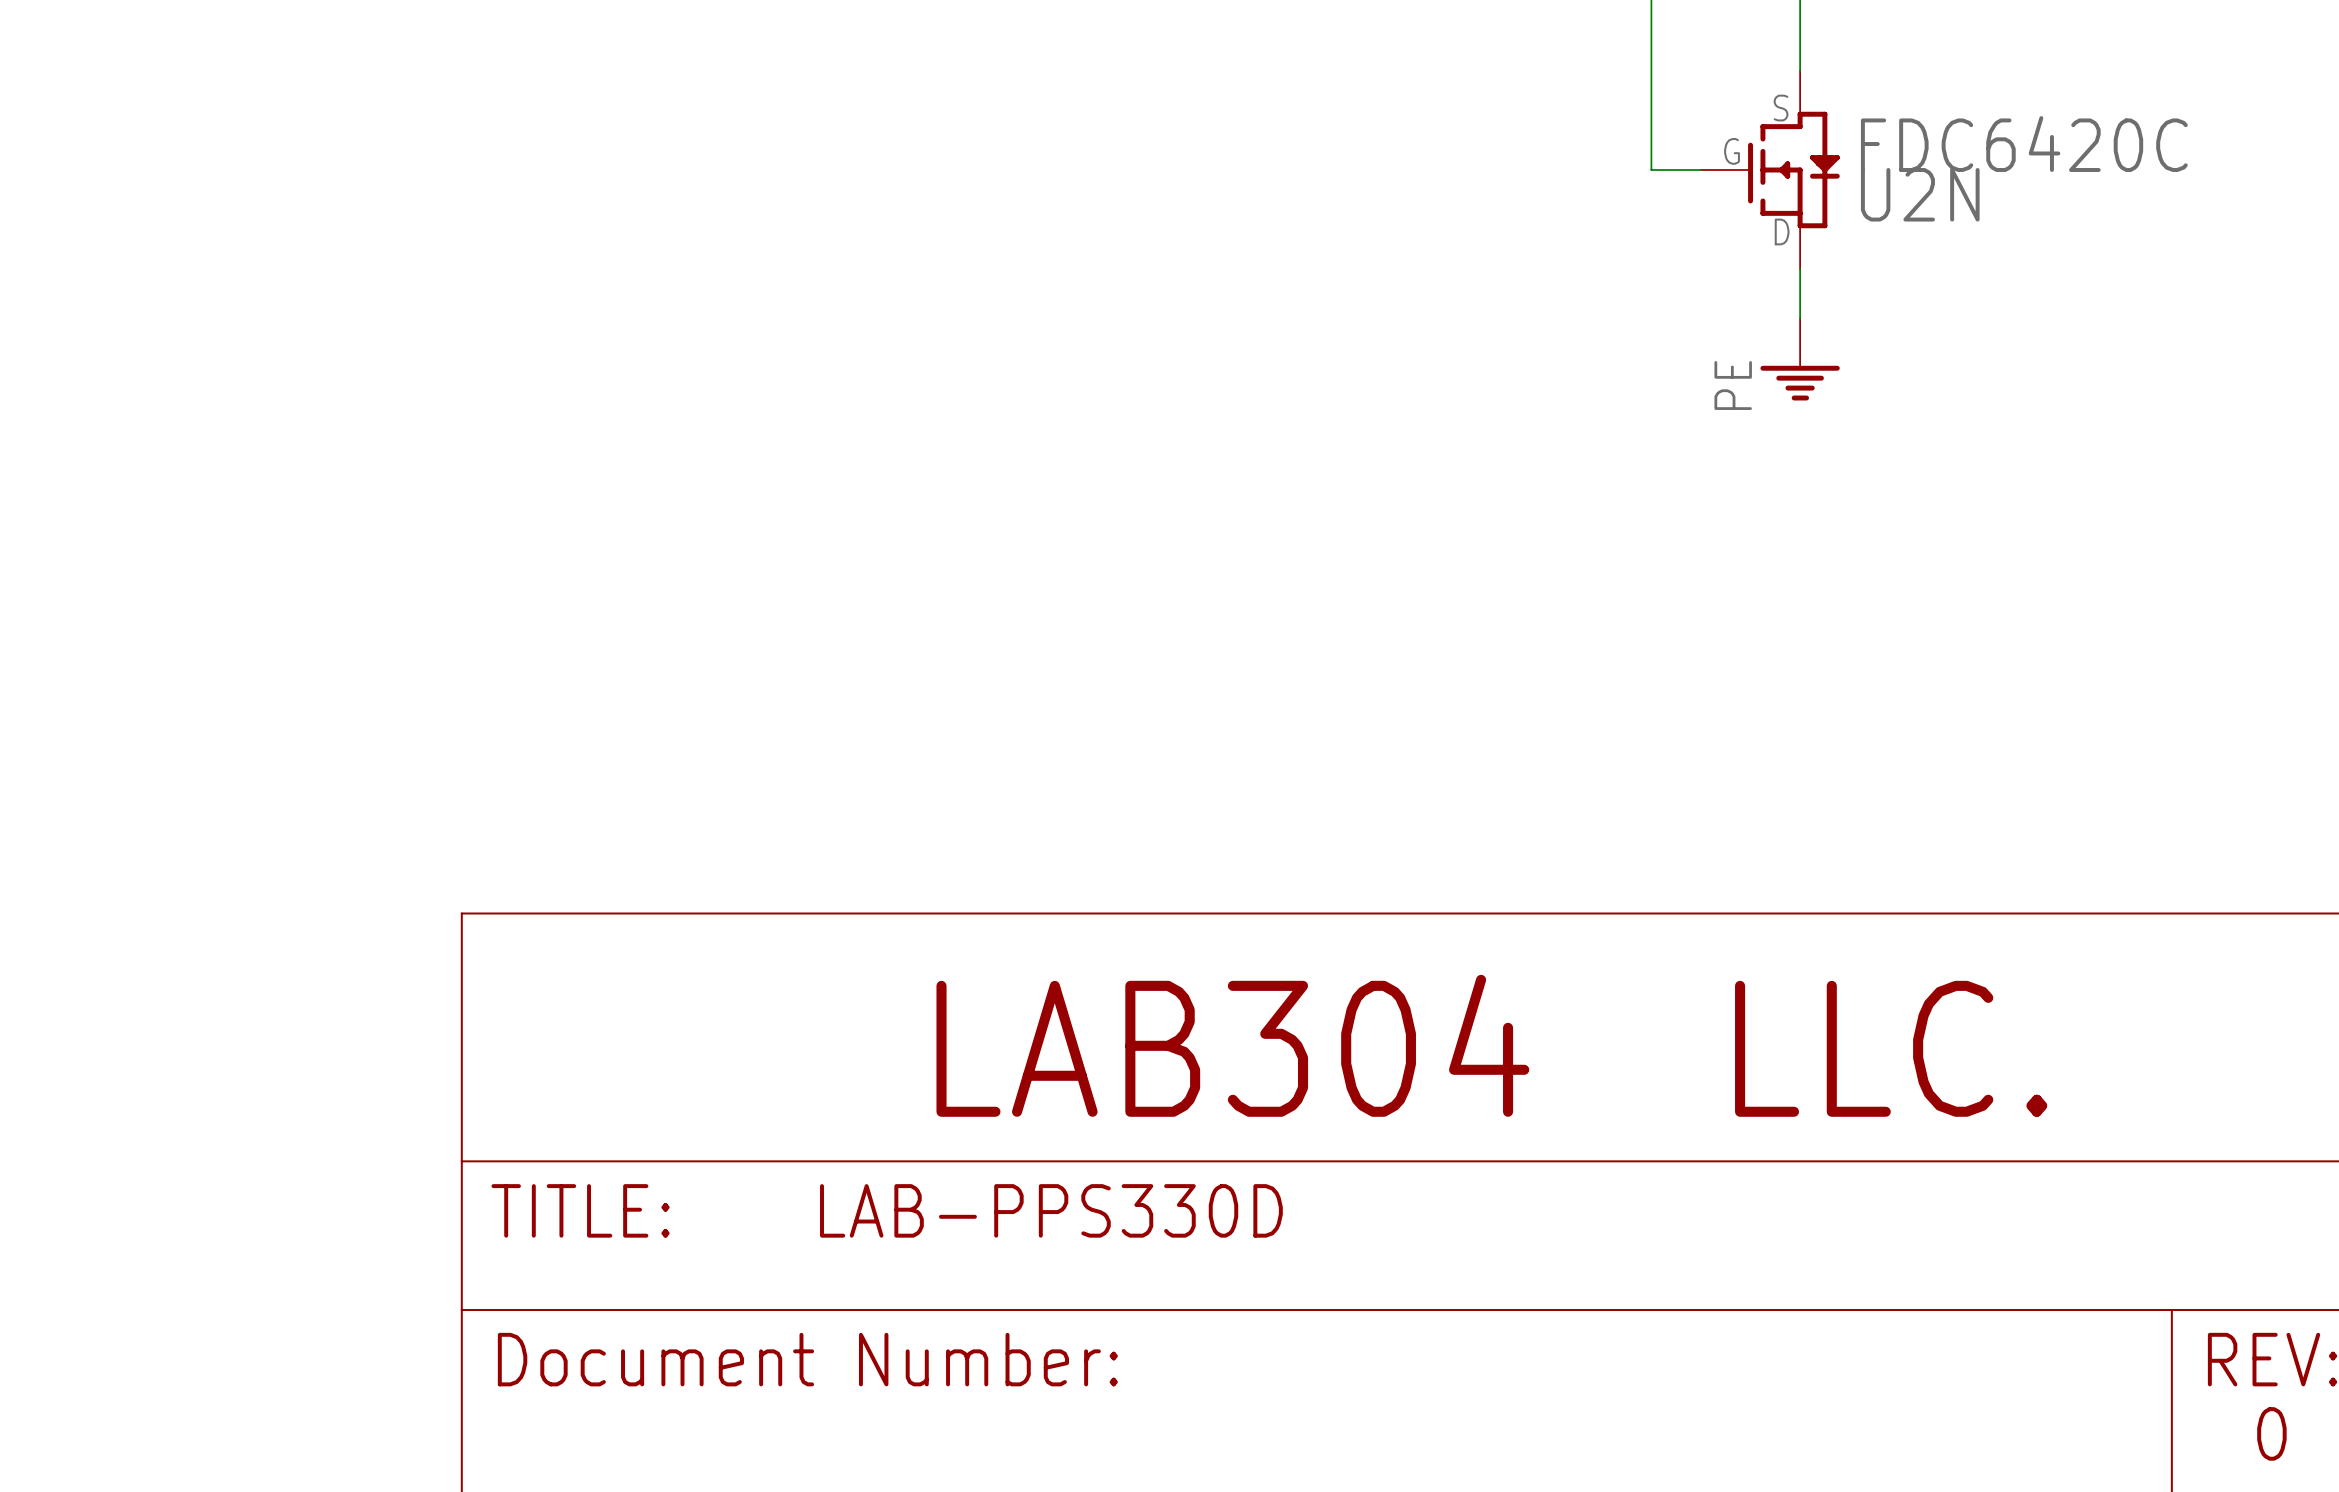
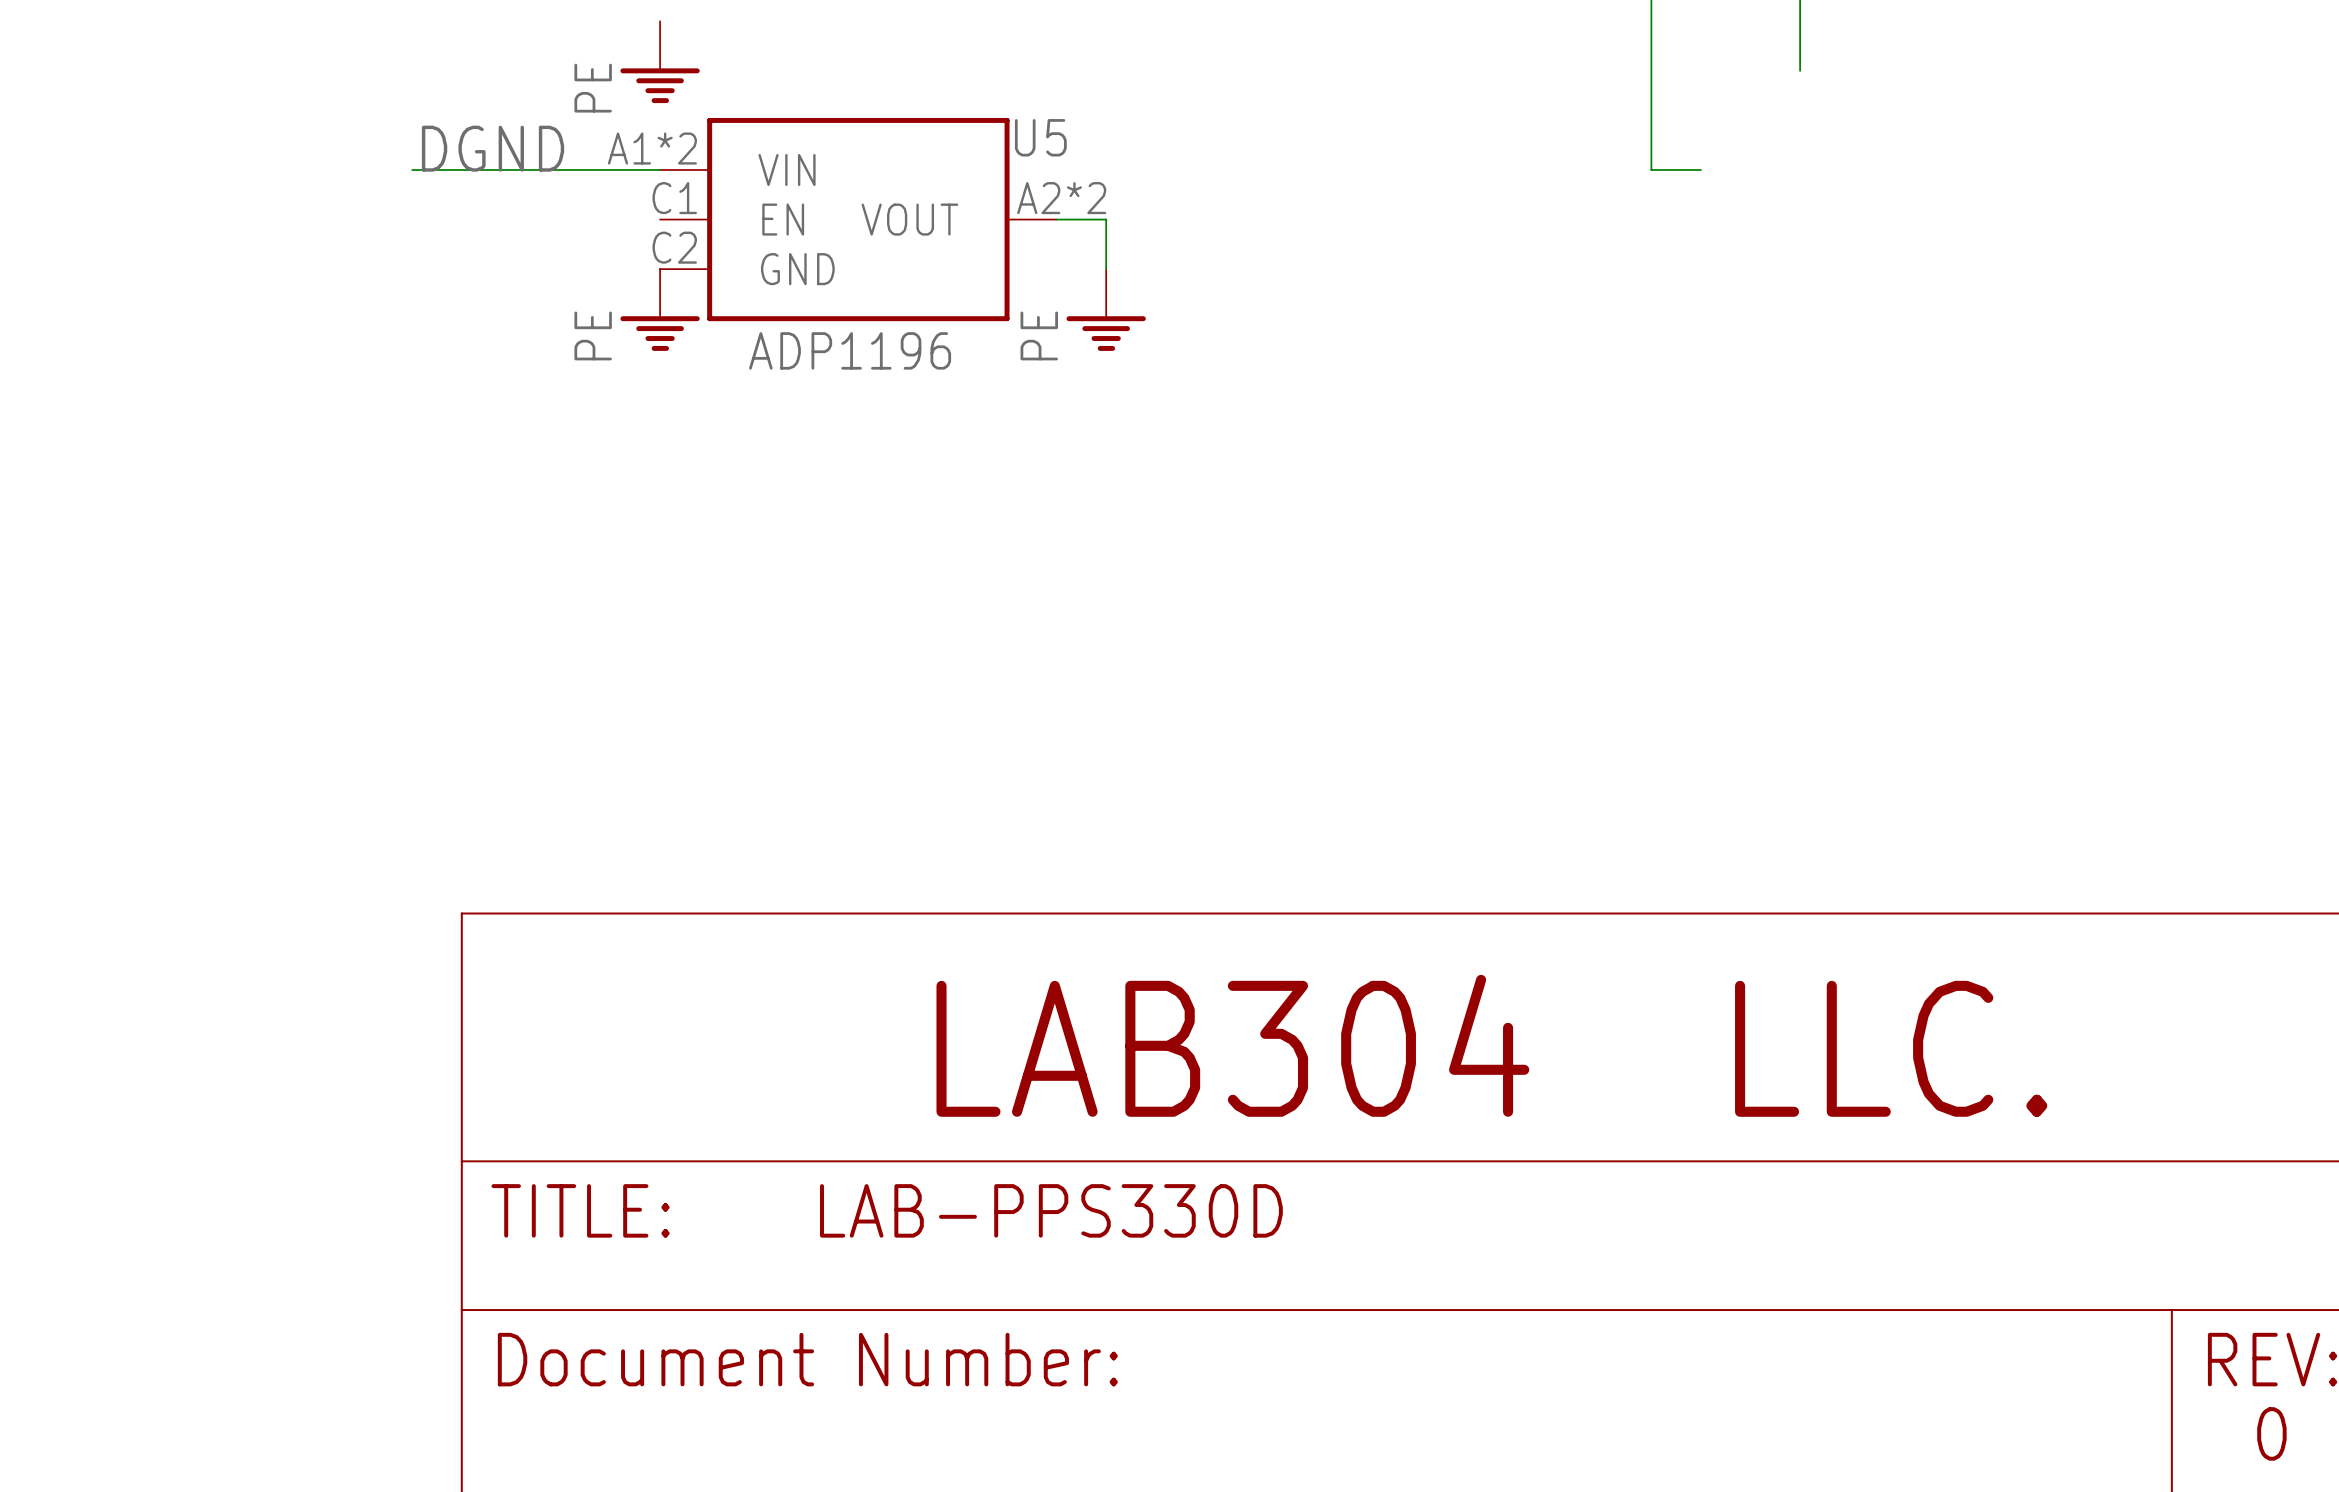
power symbol: none -> PE (660, 62)
label: none -> DGND (493, 148)
wire: none -> (412, 169) (660, 169)
U2N: FDC6420C (1770, 169) -> none
U5: none -> ADP1196 (858, 219)
wire: none -> (1056, 219) (1106, 219) (1106, 269)
wire: (1800, 269) (1800, 318) -> none
power symbol: none -> PE (660, 310)
power symbol: none -> PE (1106, 310)
power symbol: PE (1800, 359) -> none

